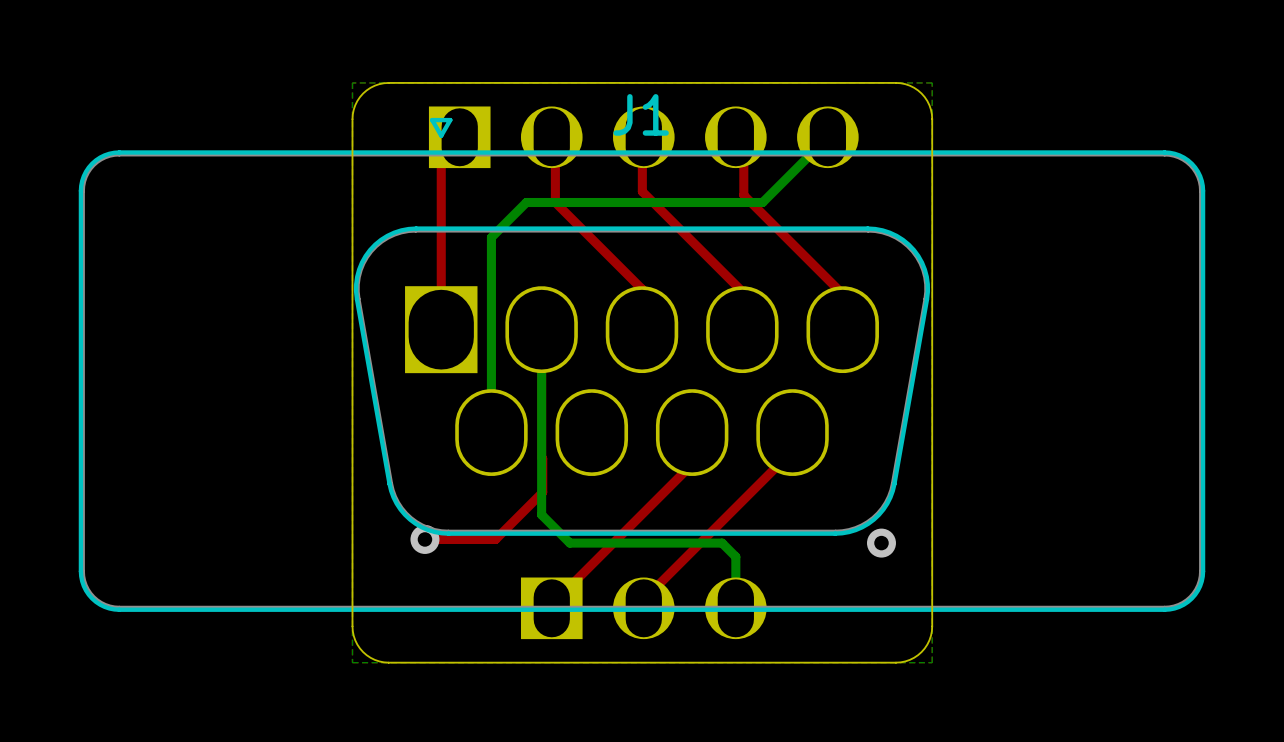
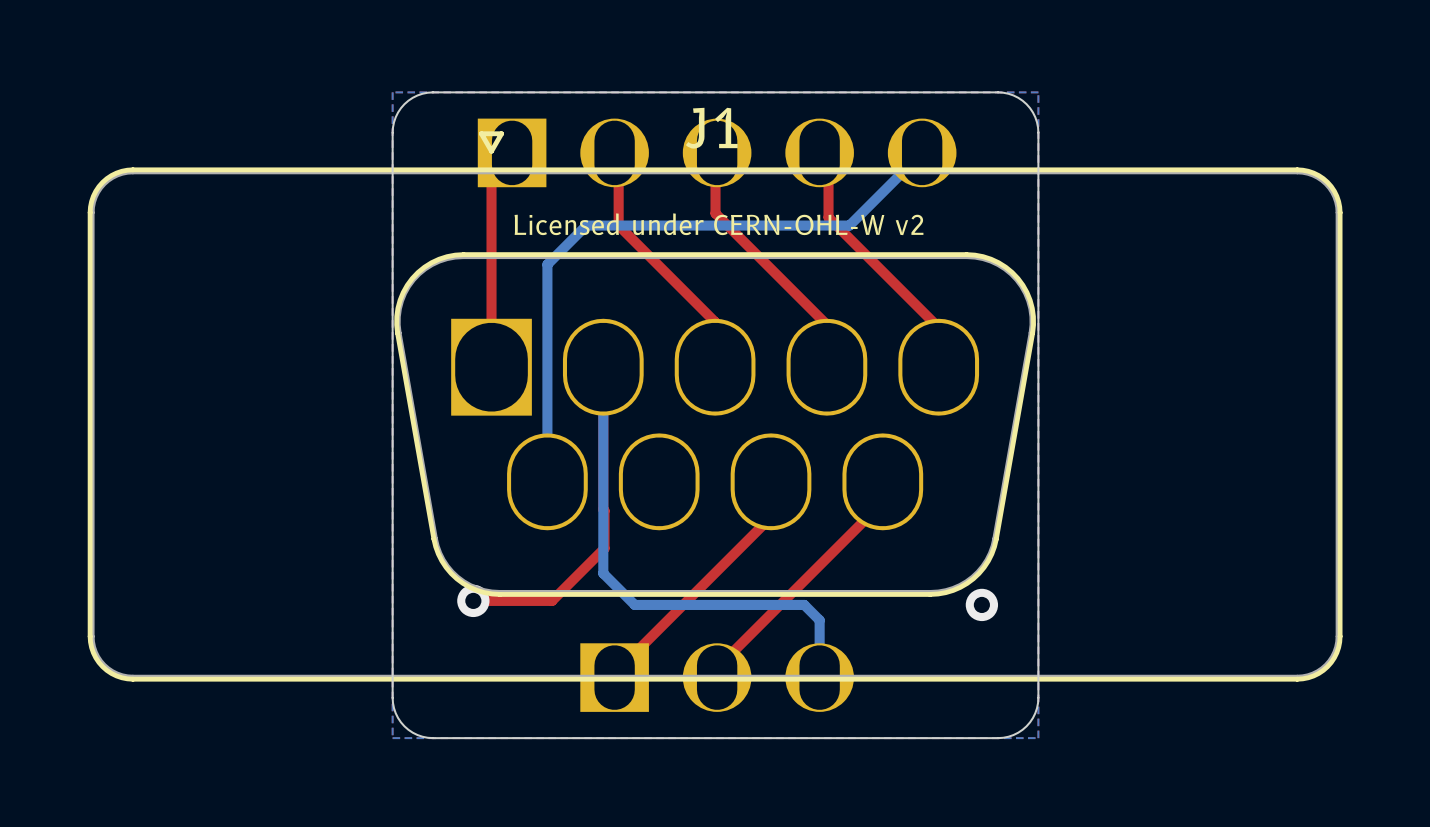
text: none -> Licensed under CERN-OHL-W v2 (718, 224)

